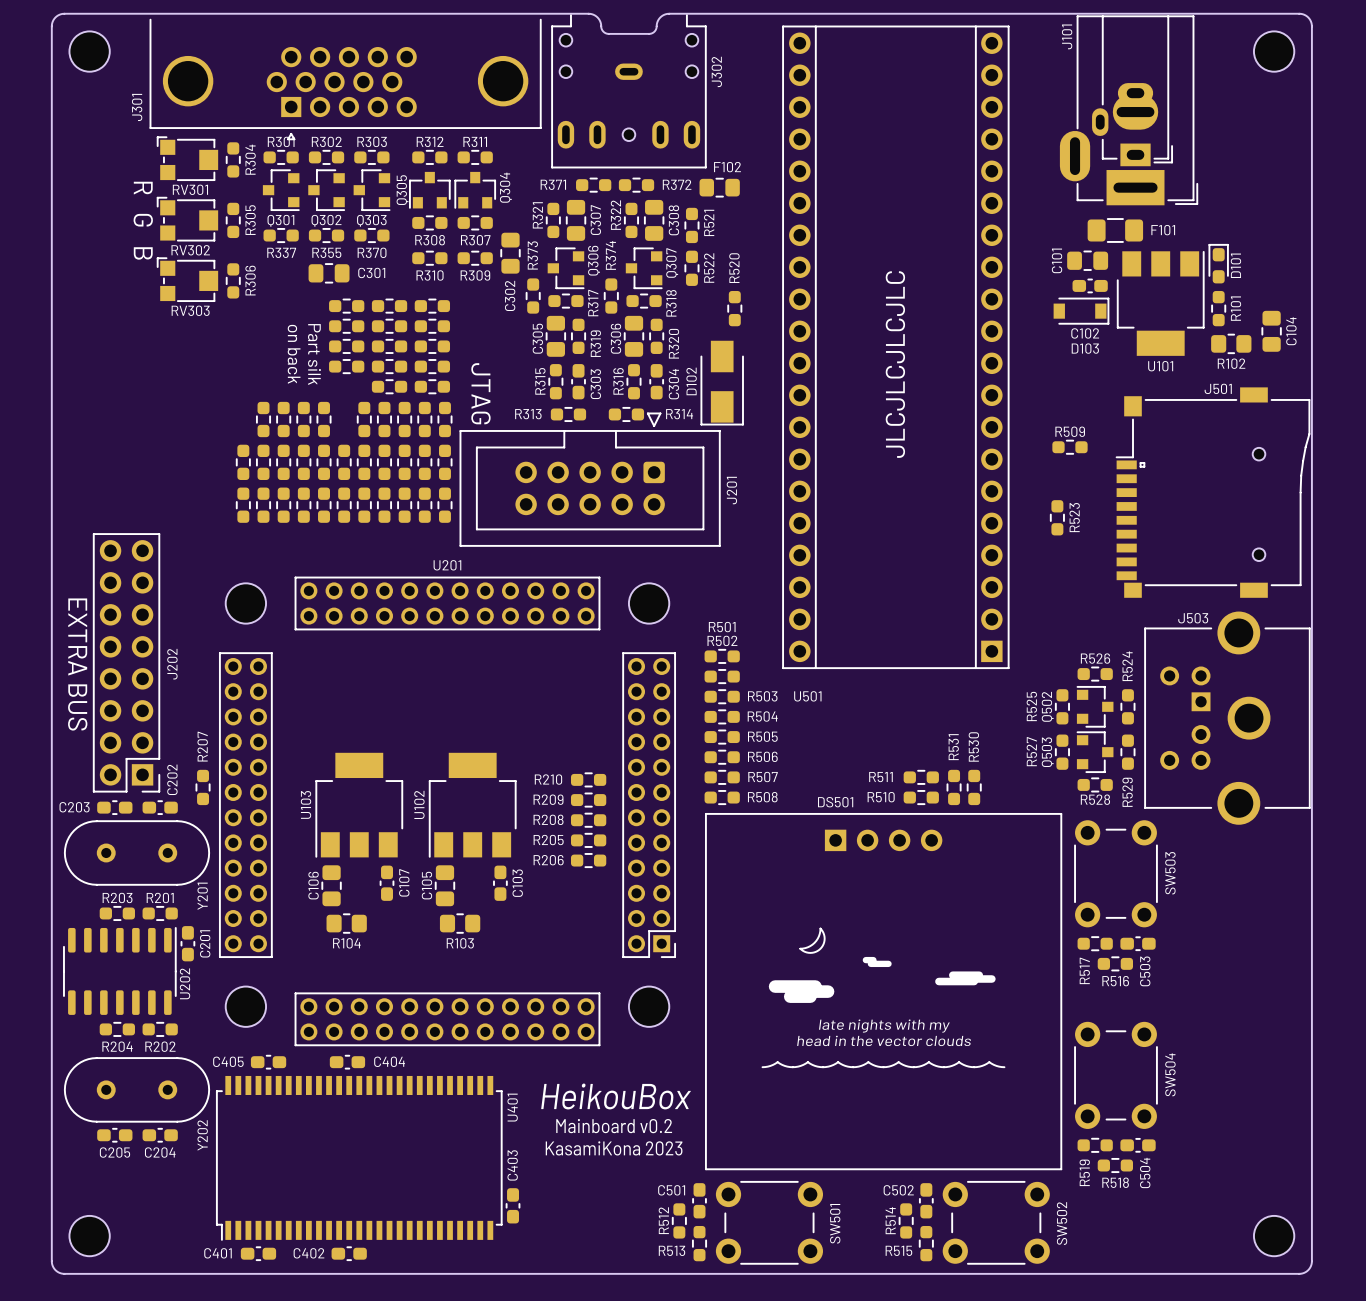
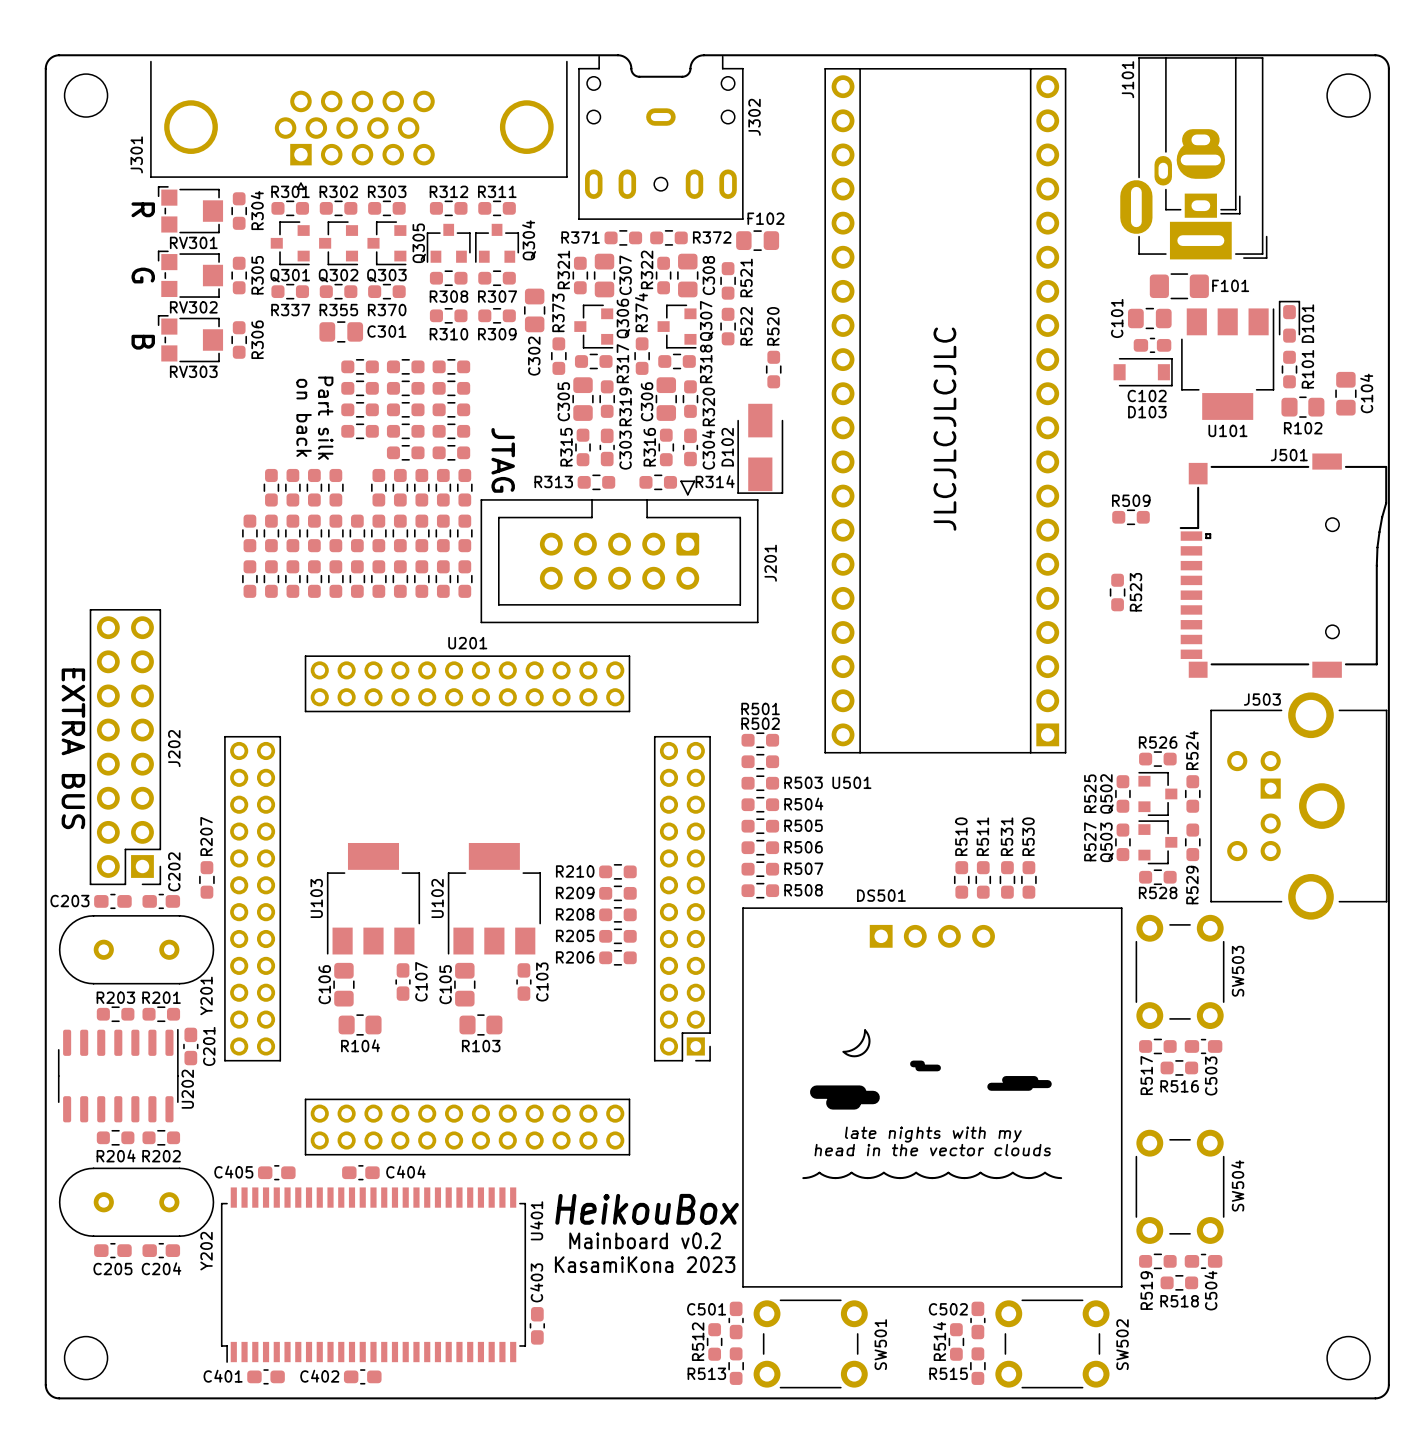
U201 footprint: [219, 576, 676, 1047] -> [224, 655, 711, 1156]
R511 rotation: 0° (921, 777) -> 90° clockwise (983, 879)
R510 rotation: 0° (921, 797) -> 90° clockwise (961, 879)

